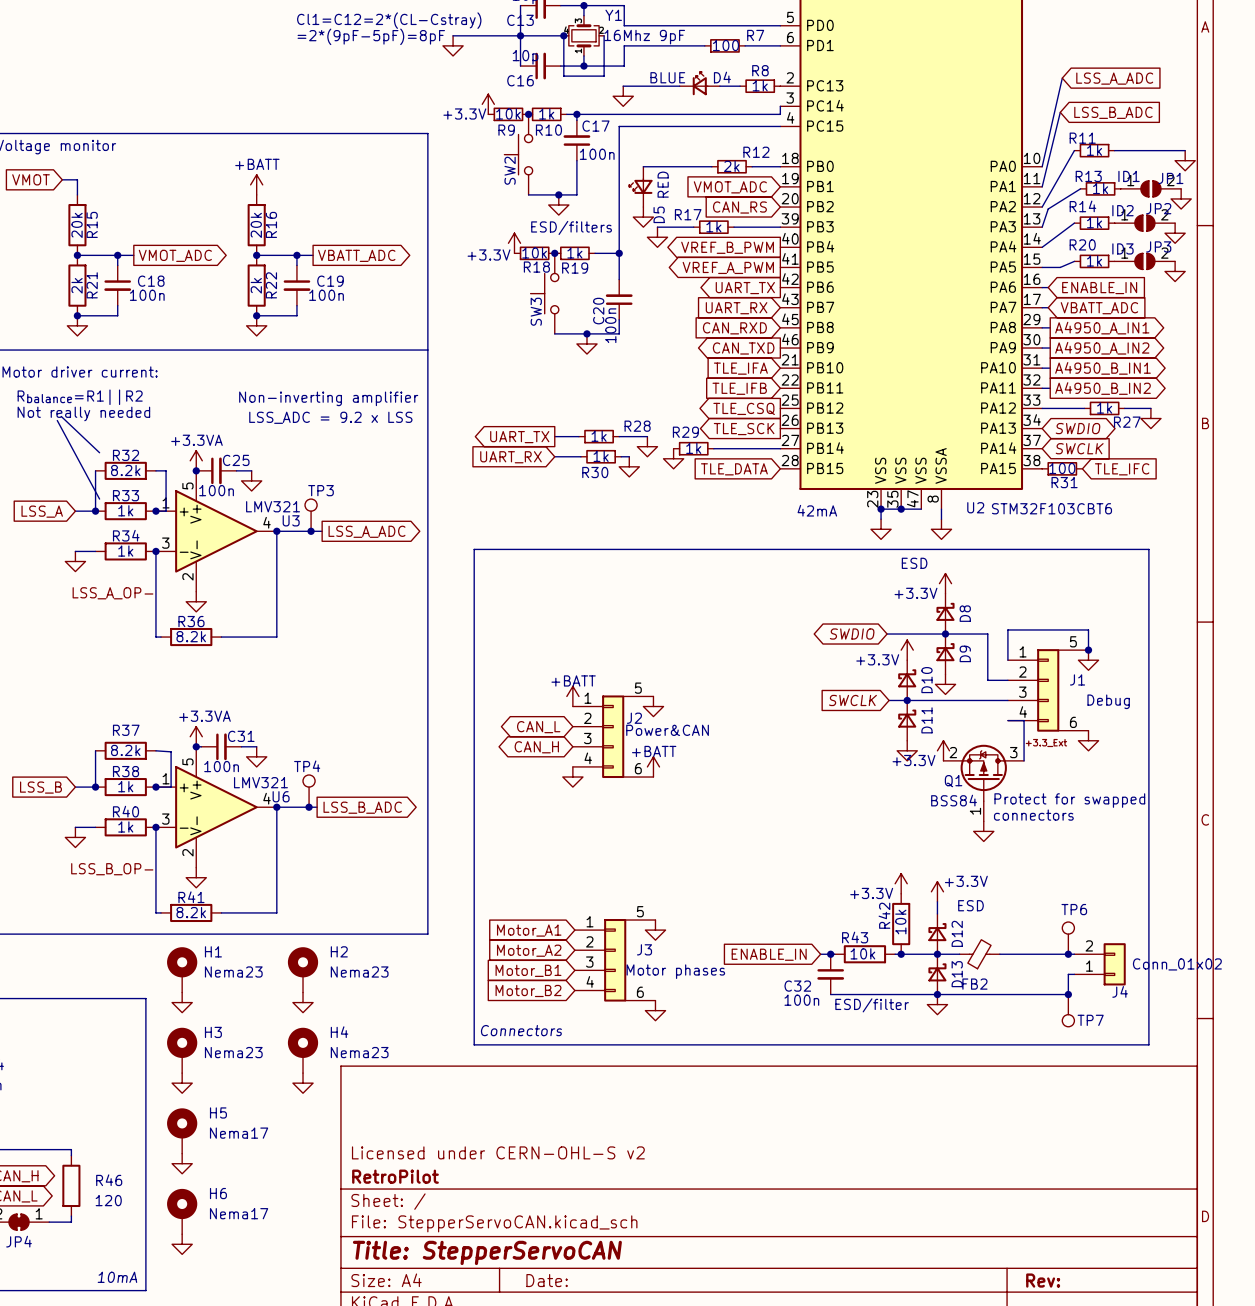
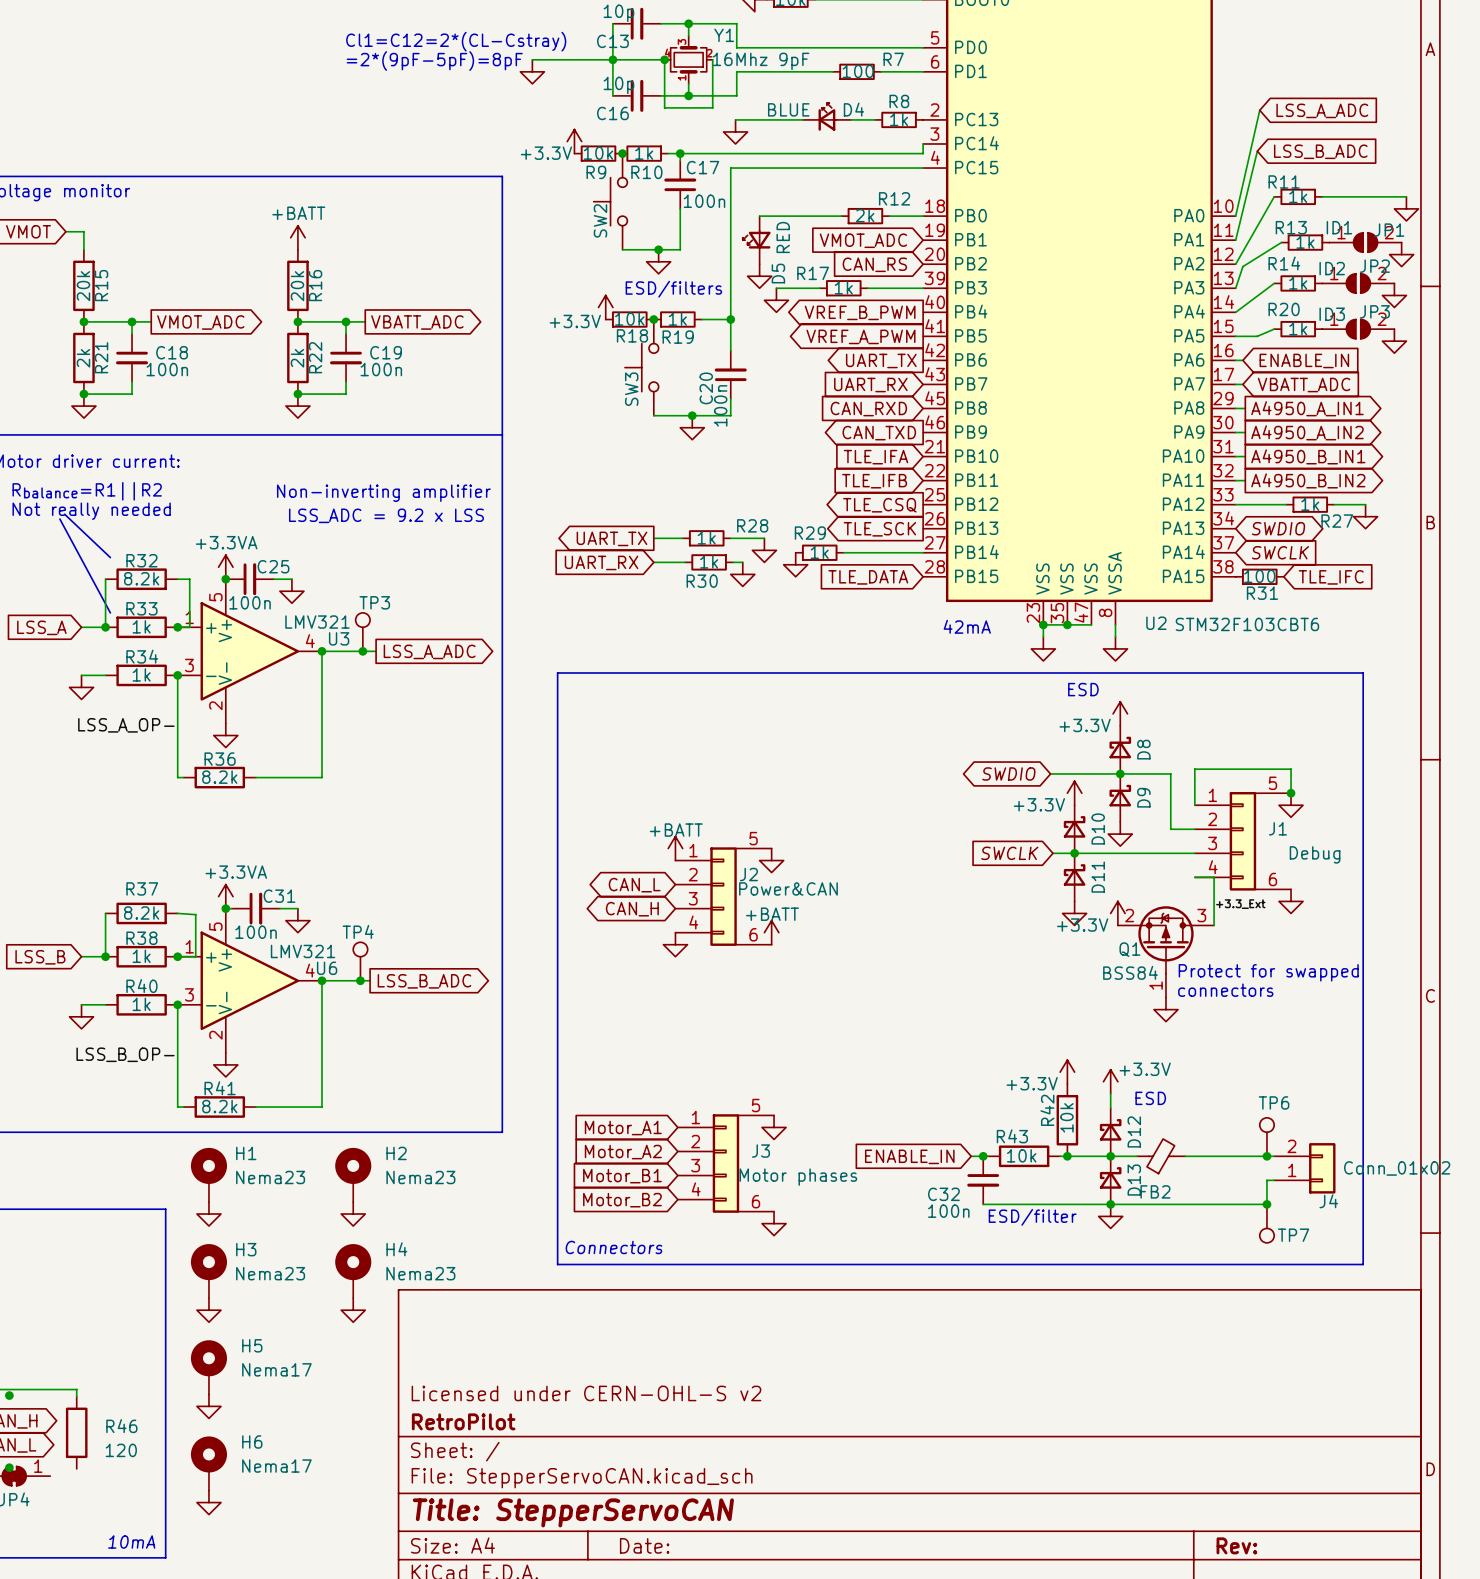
junction: none -> (9, 1395)
junction: none -> (9, 1467)
wire: (71, 1216) (71, 1222) (49, 1222) -> none

